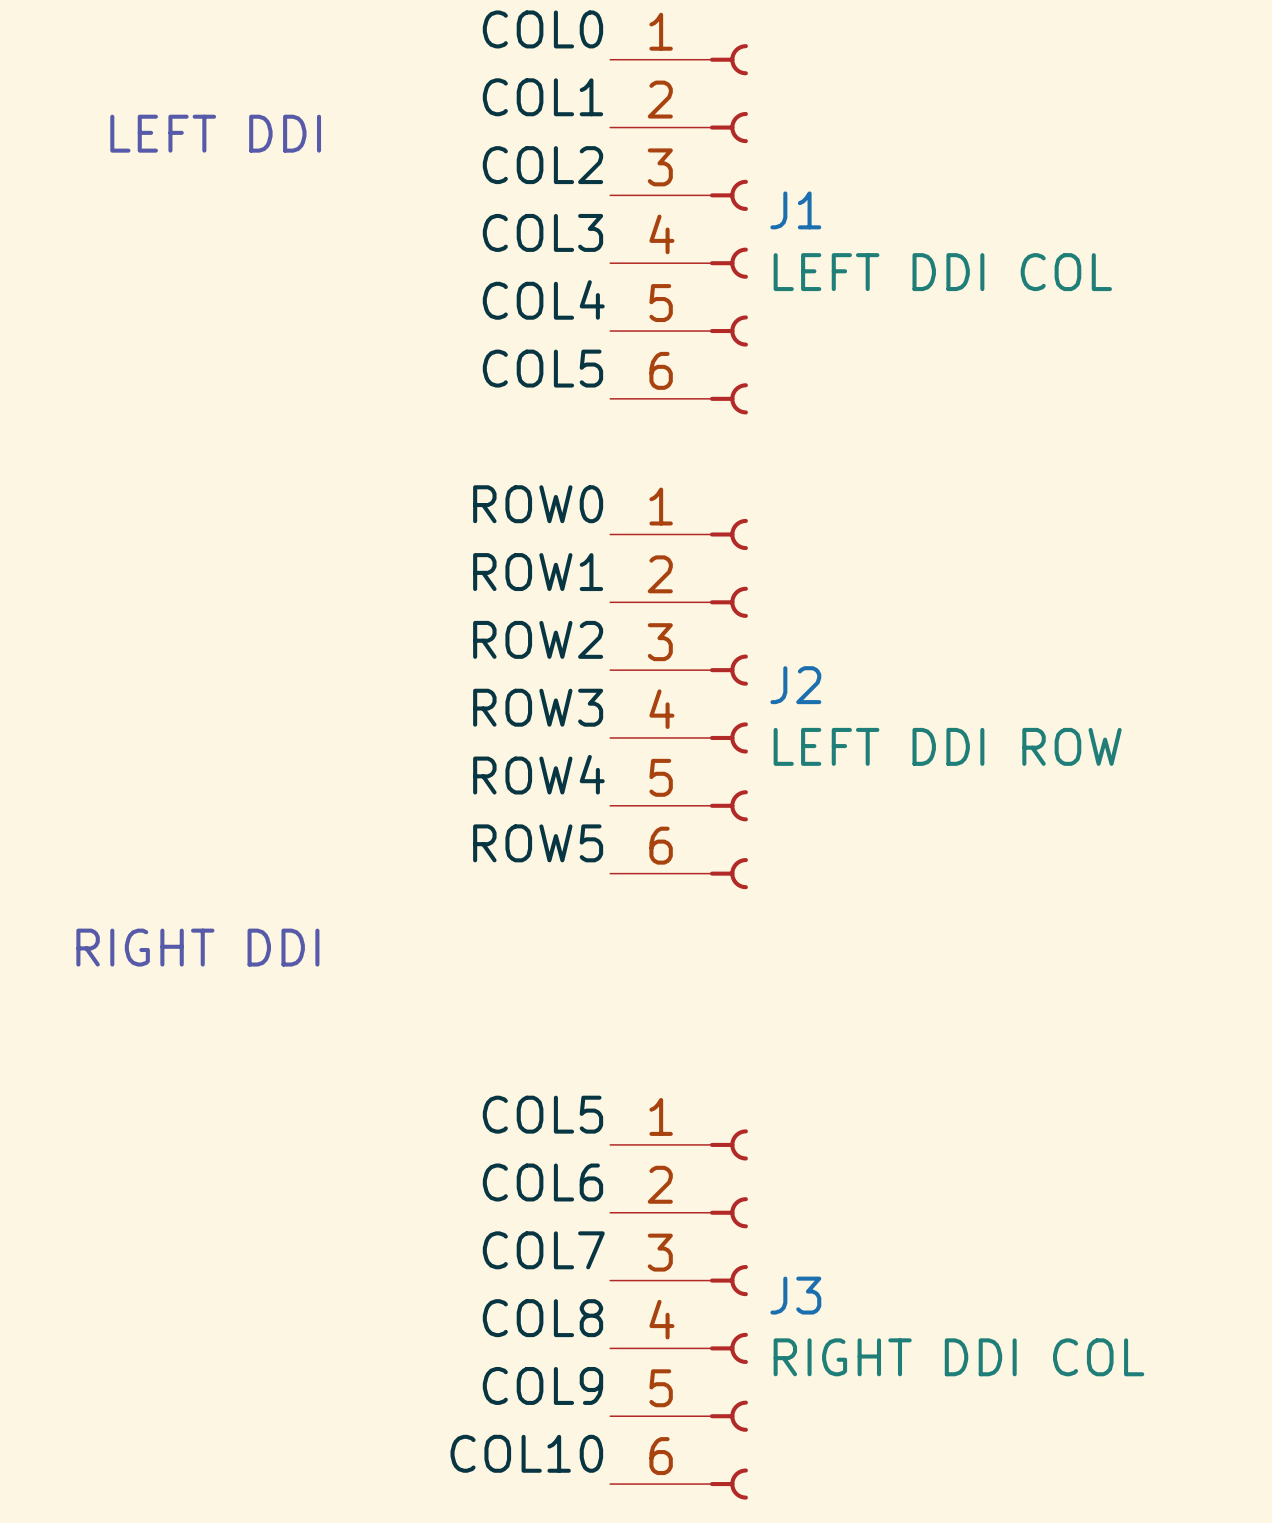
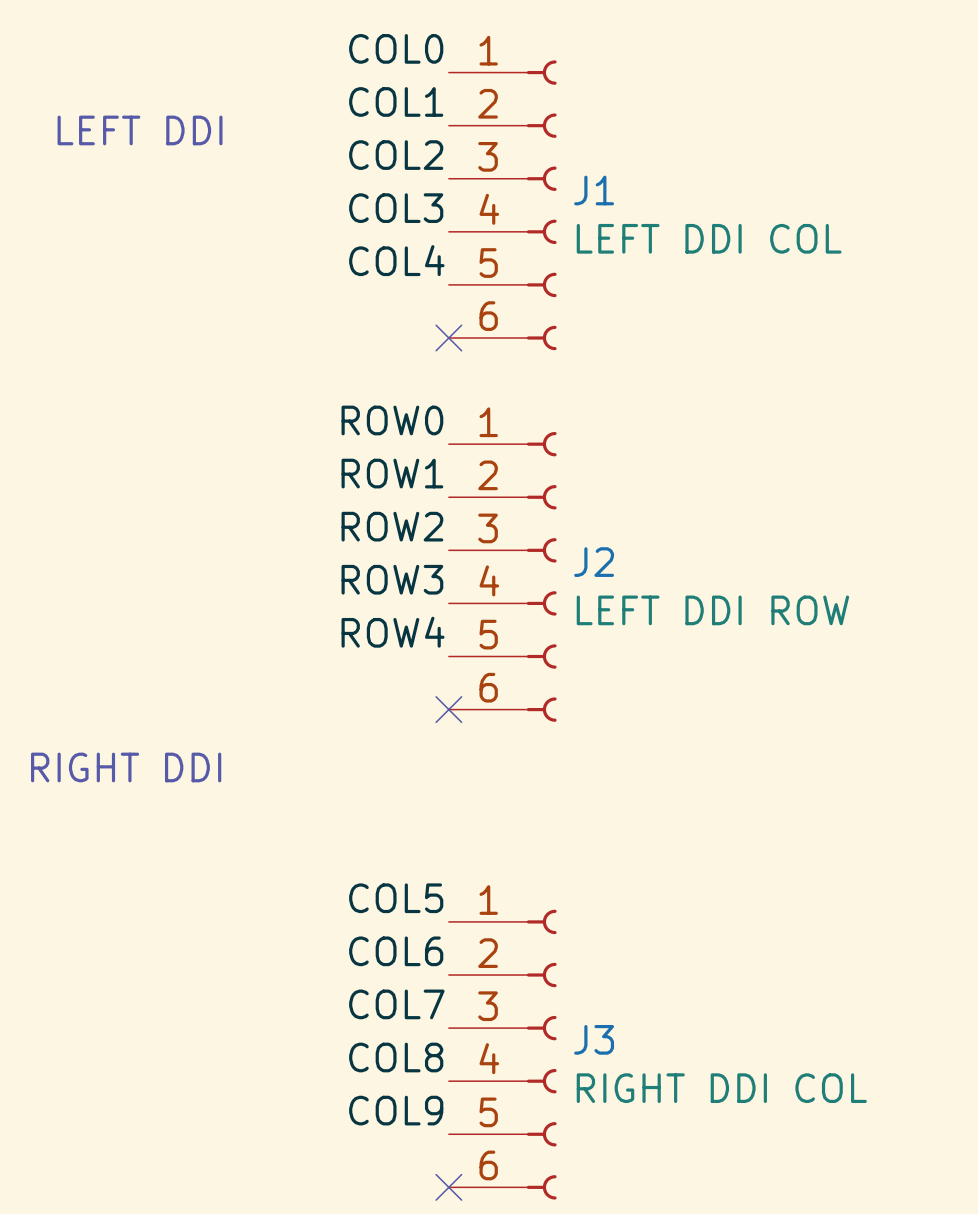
label: COL5 (542, 368) -> none
no-connect mark: none -> (448, 338)
label: ROW5 (538, 843) -> none
no-connect mark: none -> (448, 709)
label: COL10 (526, 1453) -> none
no-connect mark: none -> (448, 1187)

